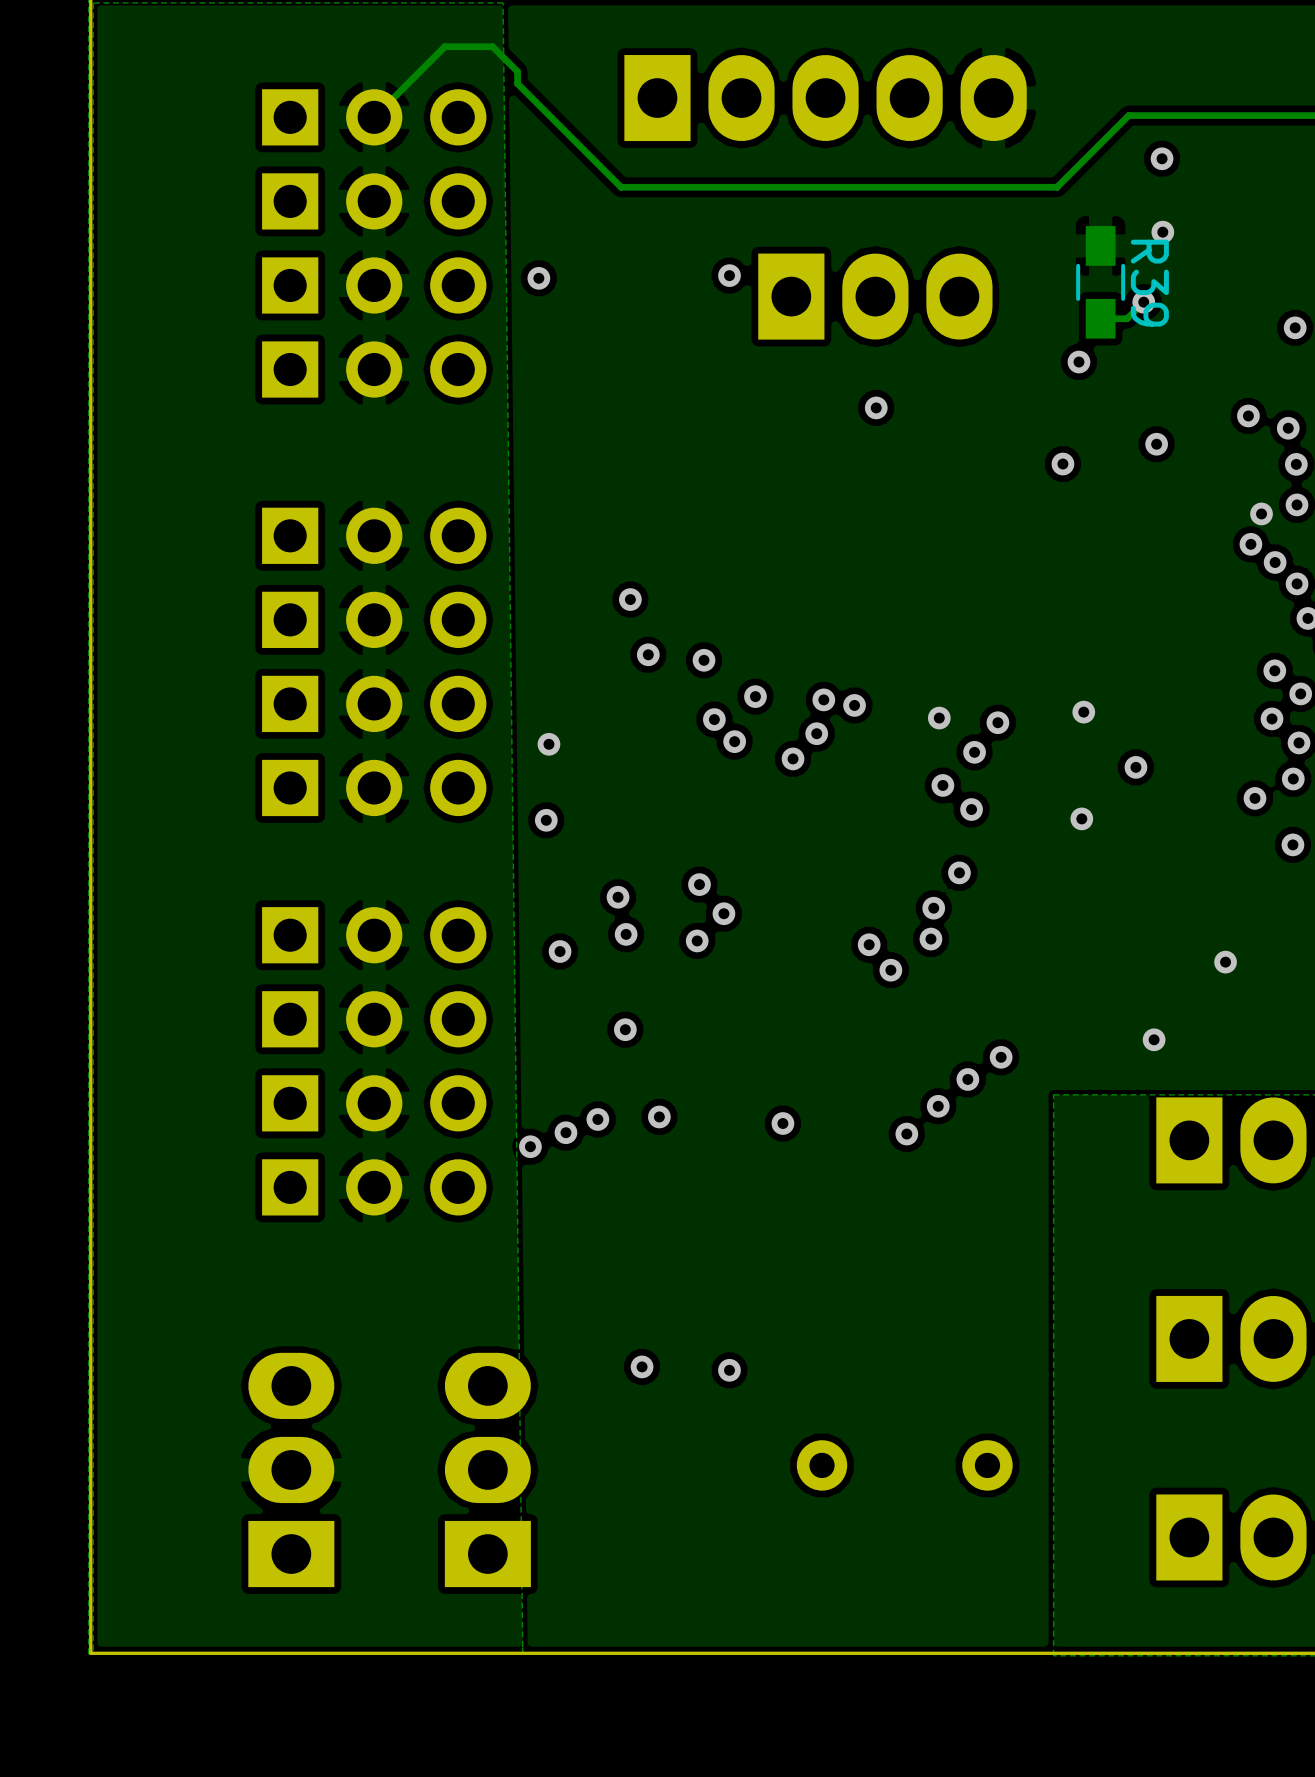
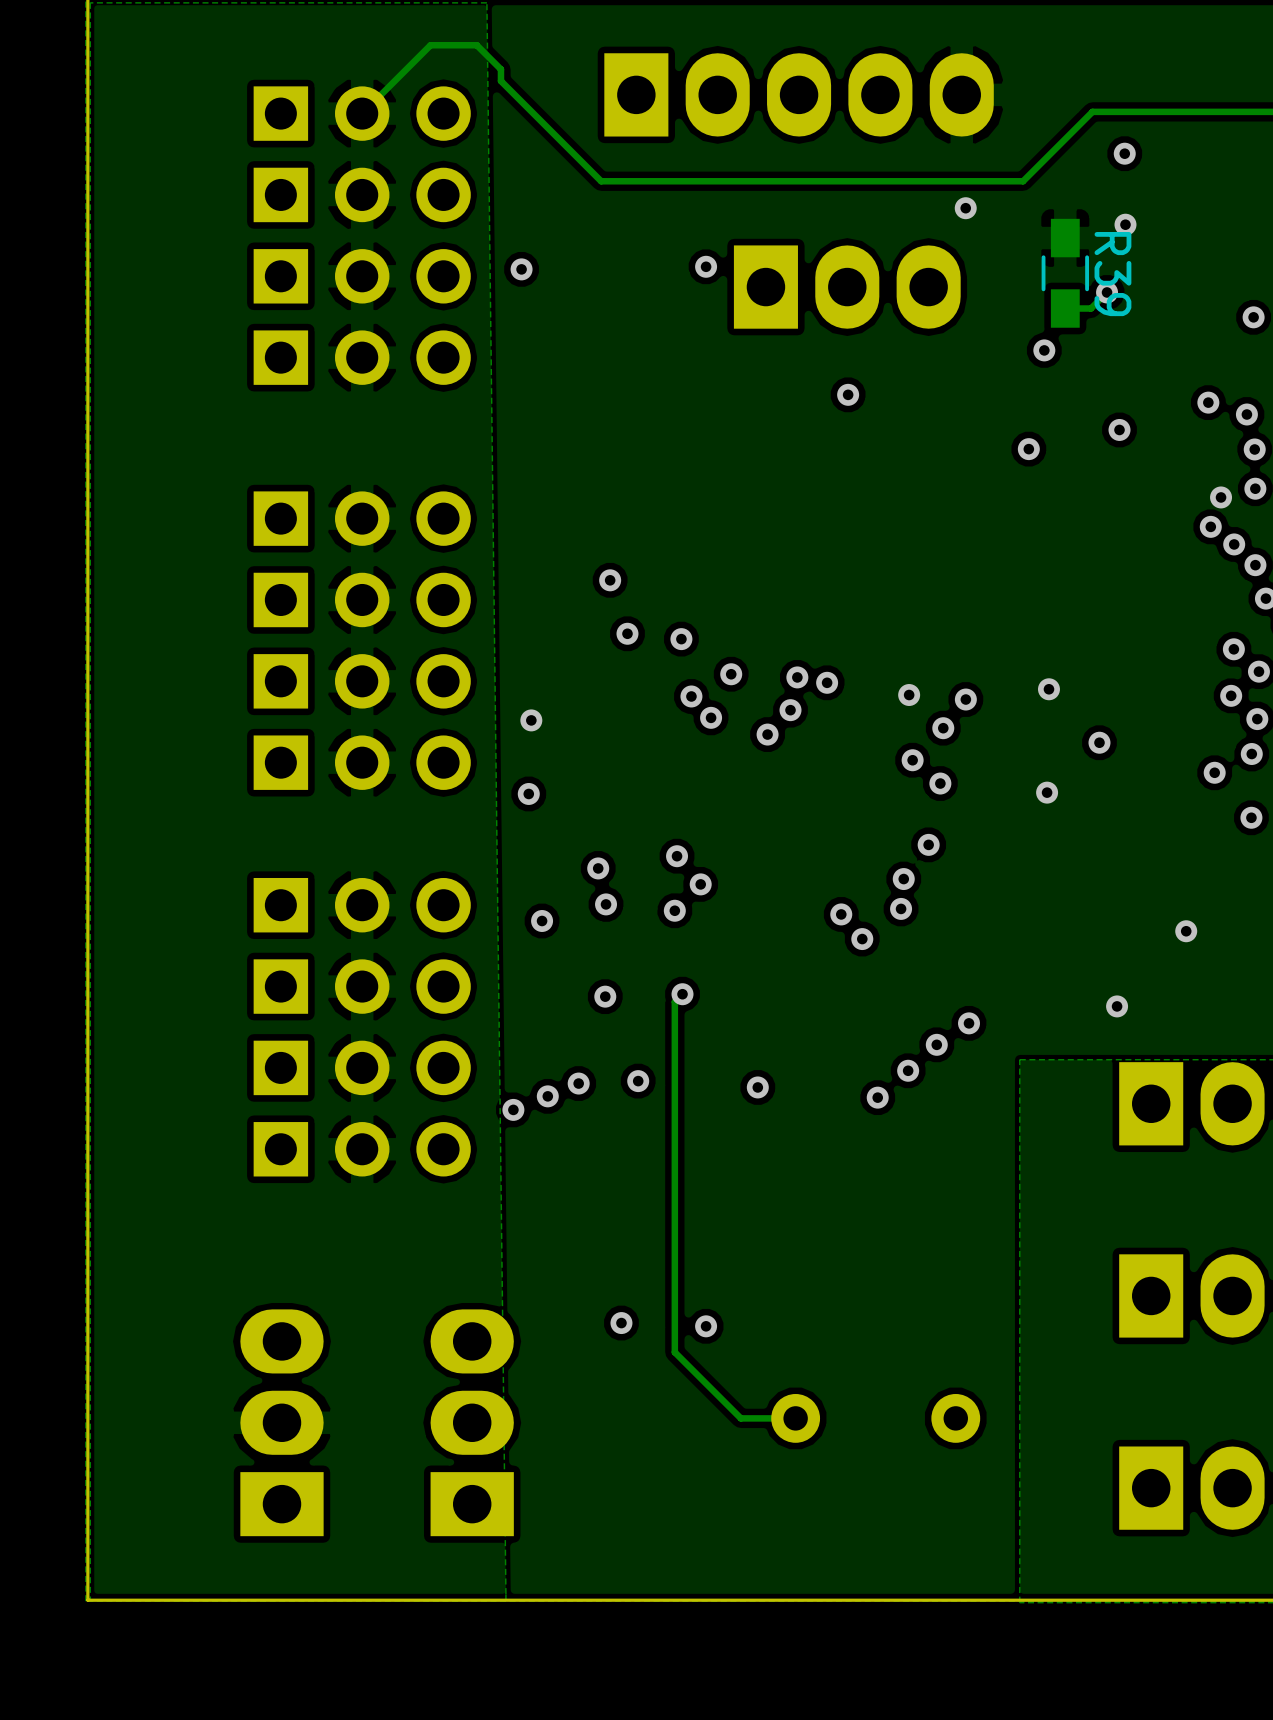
via: none -> (965, 208)
track: none -> (682, 994) (674, 1001) (674, 1352) (740, 1418) (795, 1418)
via: none -> (682, 994)

